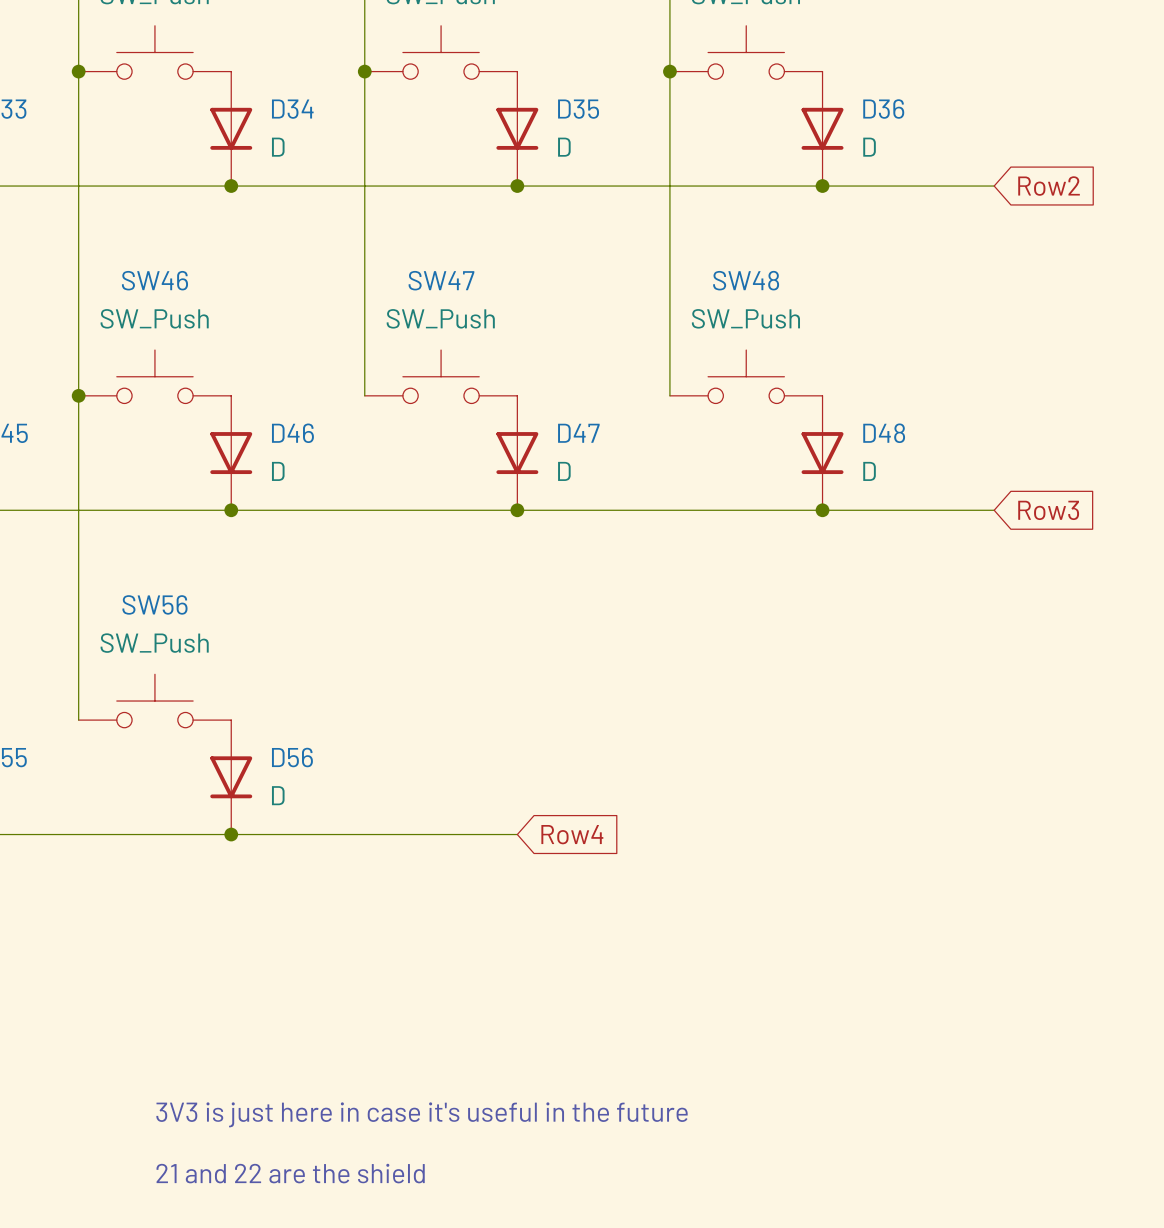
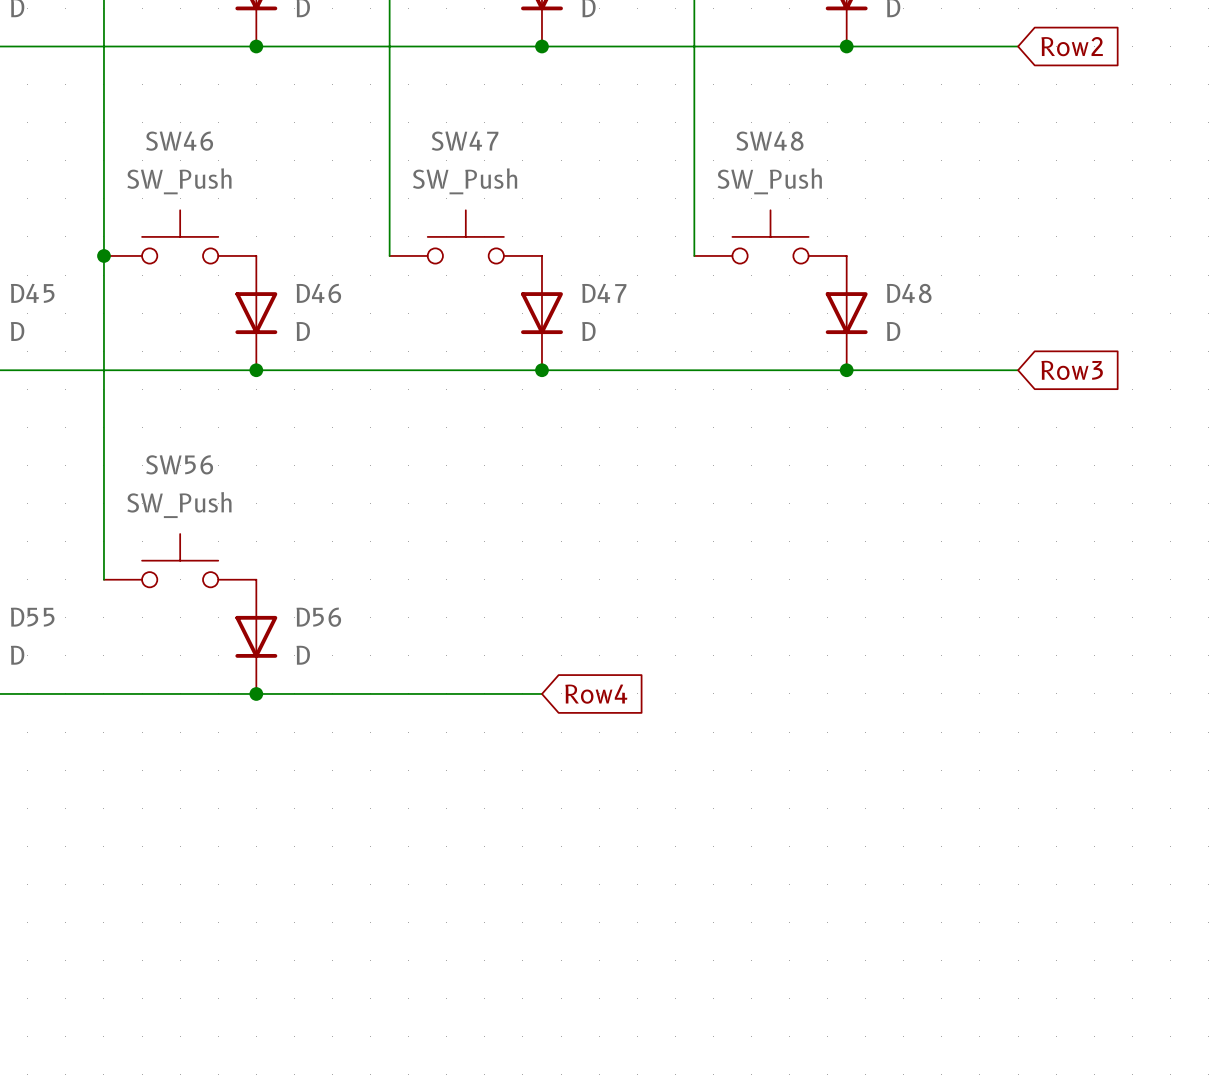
text: 3V3 is just here in case it's useful in the future (422, 1114) -> none
text: 21 and 22 are the shield (290, 1173) -> none

